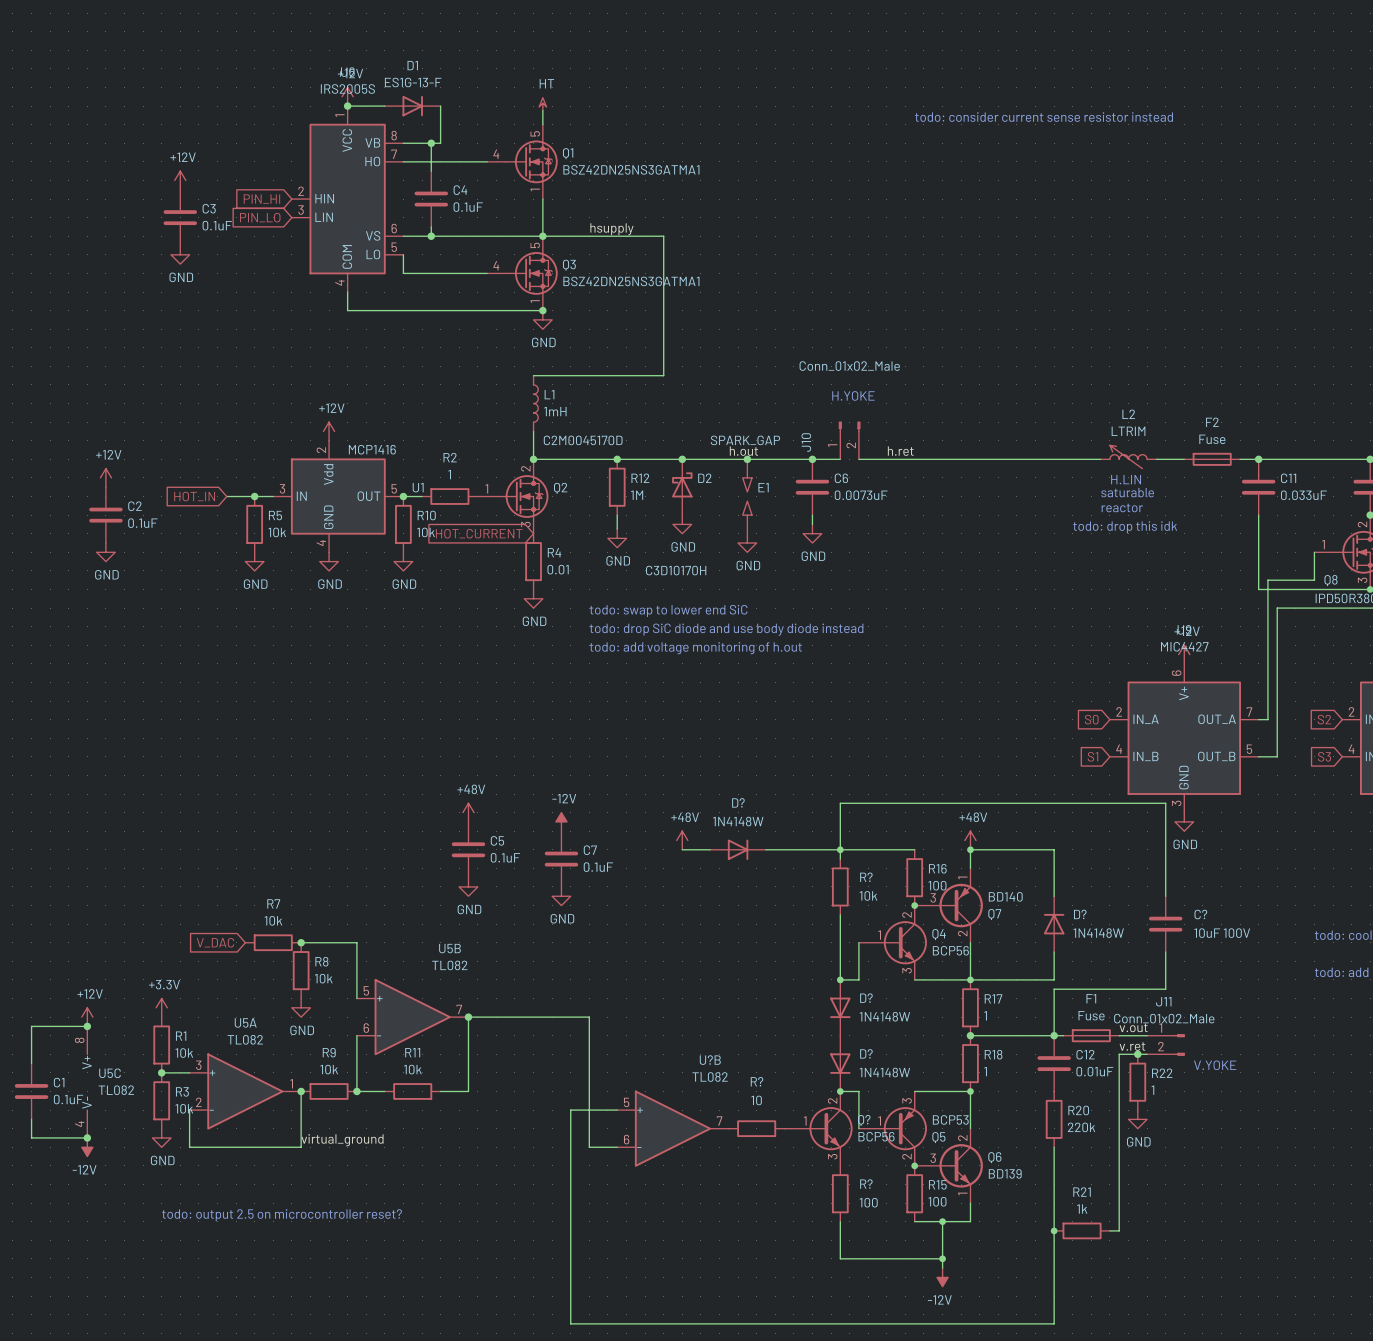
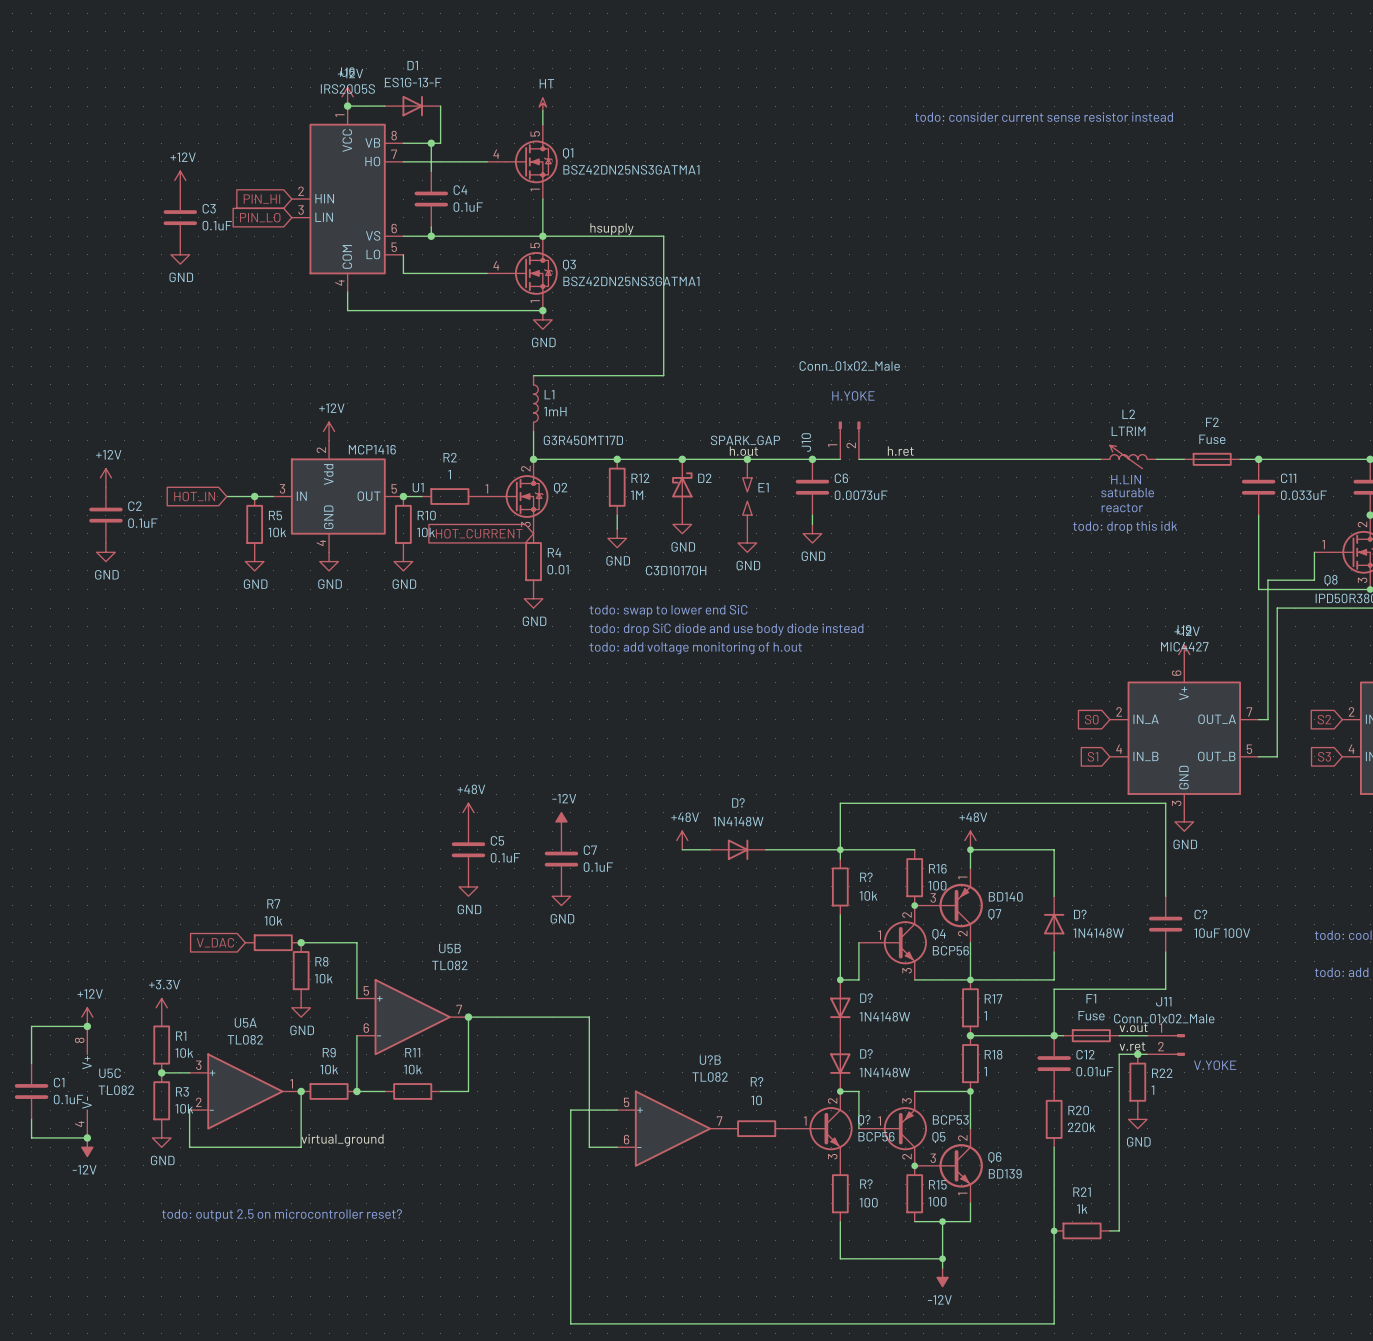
Q2 value: C2M0045170D (583, 440) -> G3R450MT17D (583, 440)

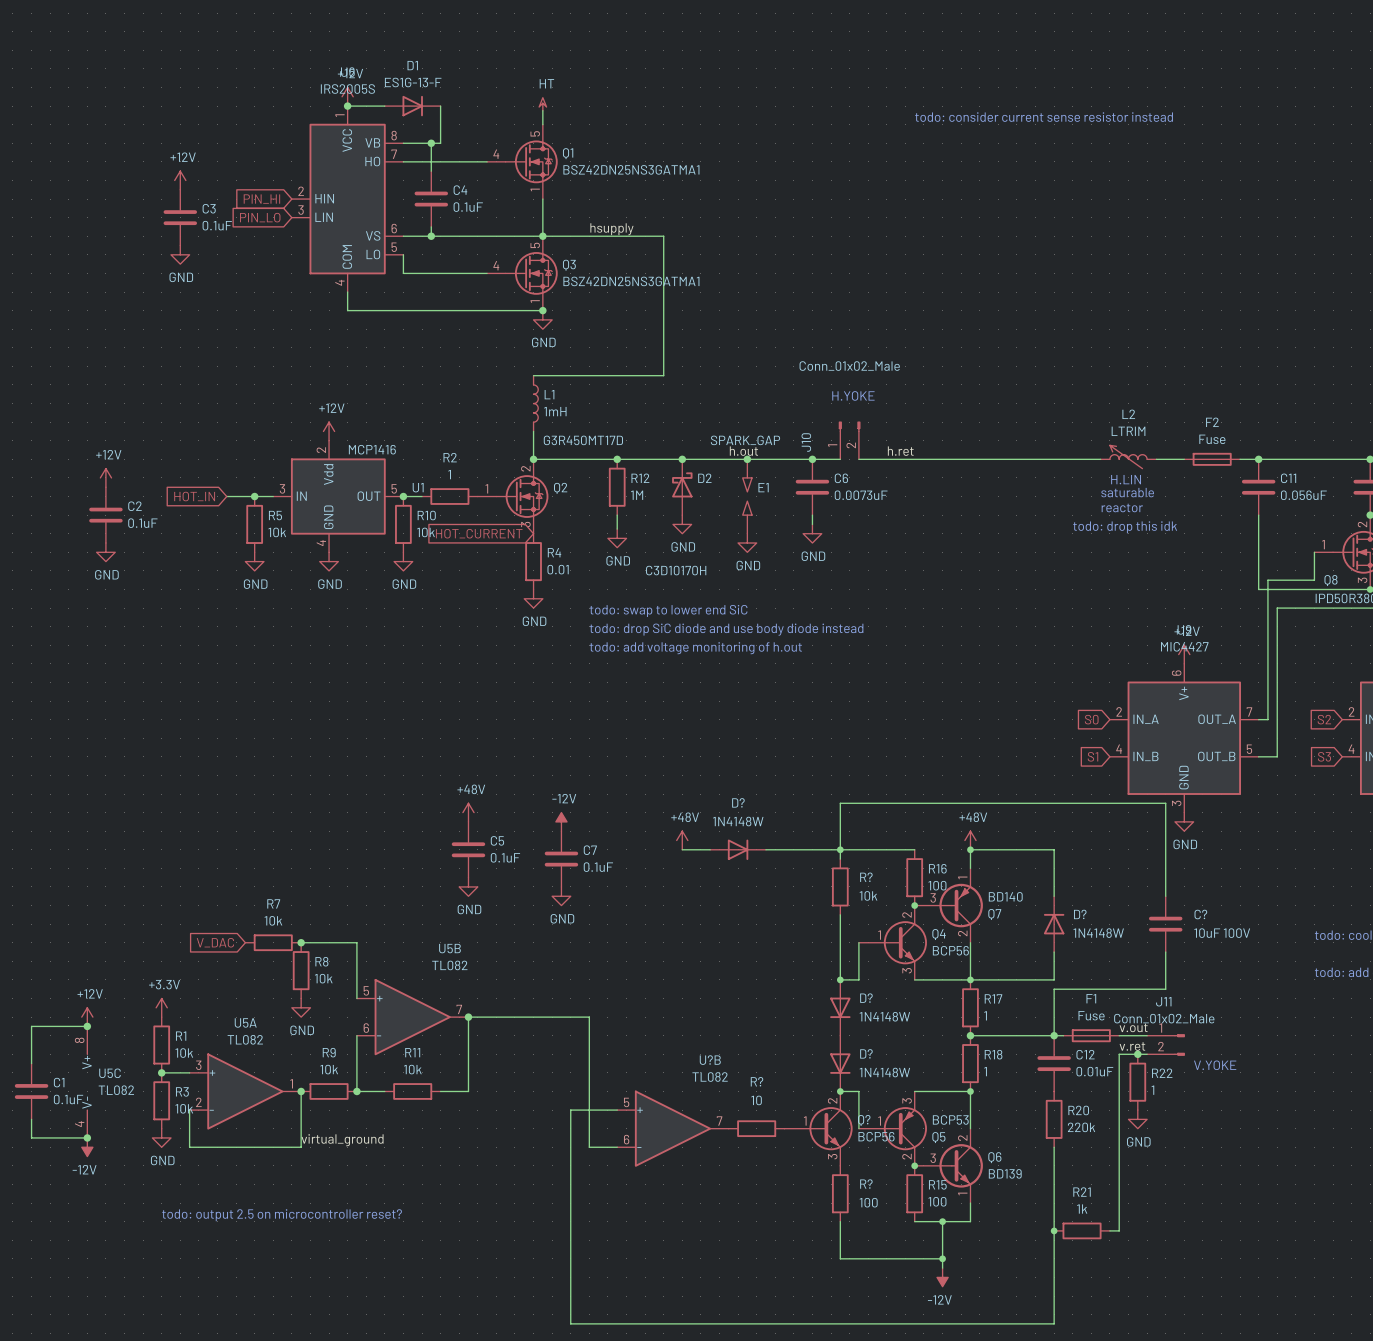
C11 value: 0.033uF (1303, 495) -> 0.056uF (1303, 495)

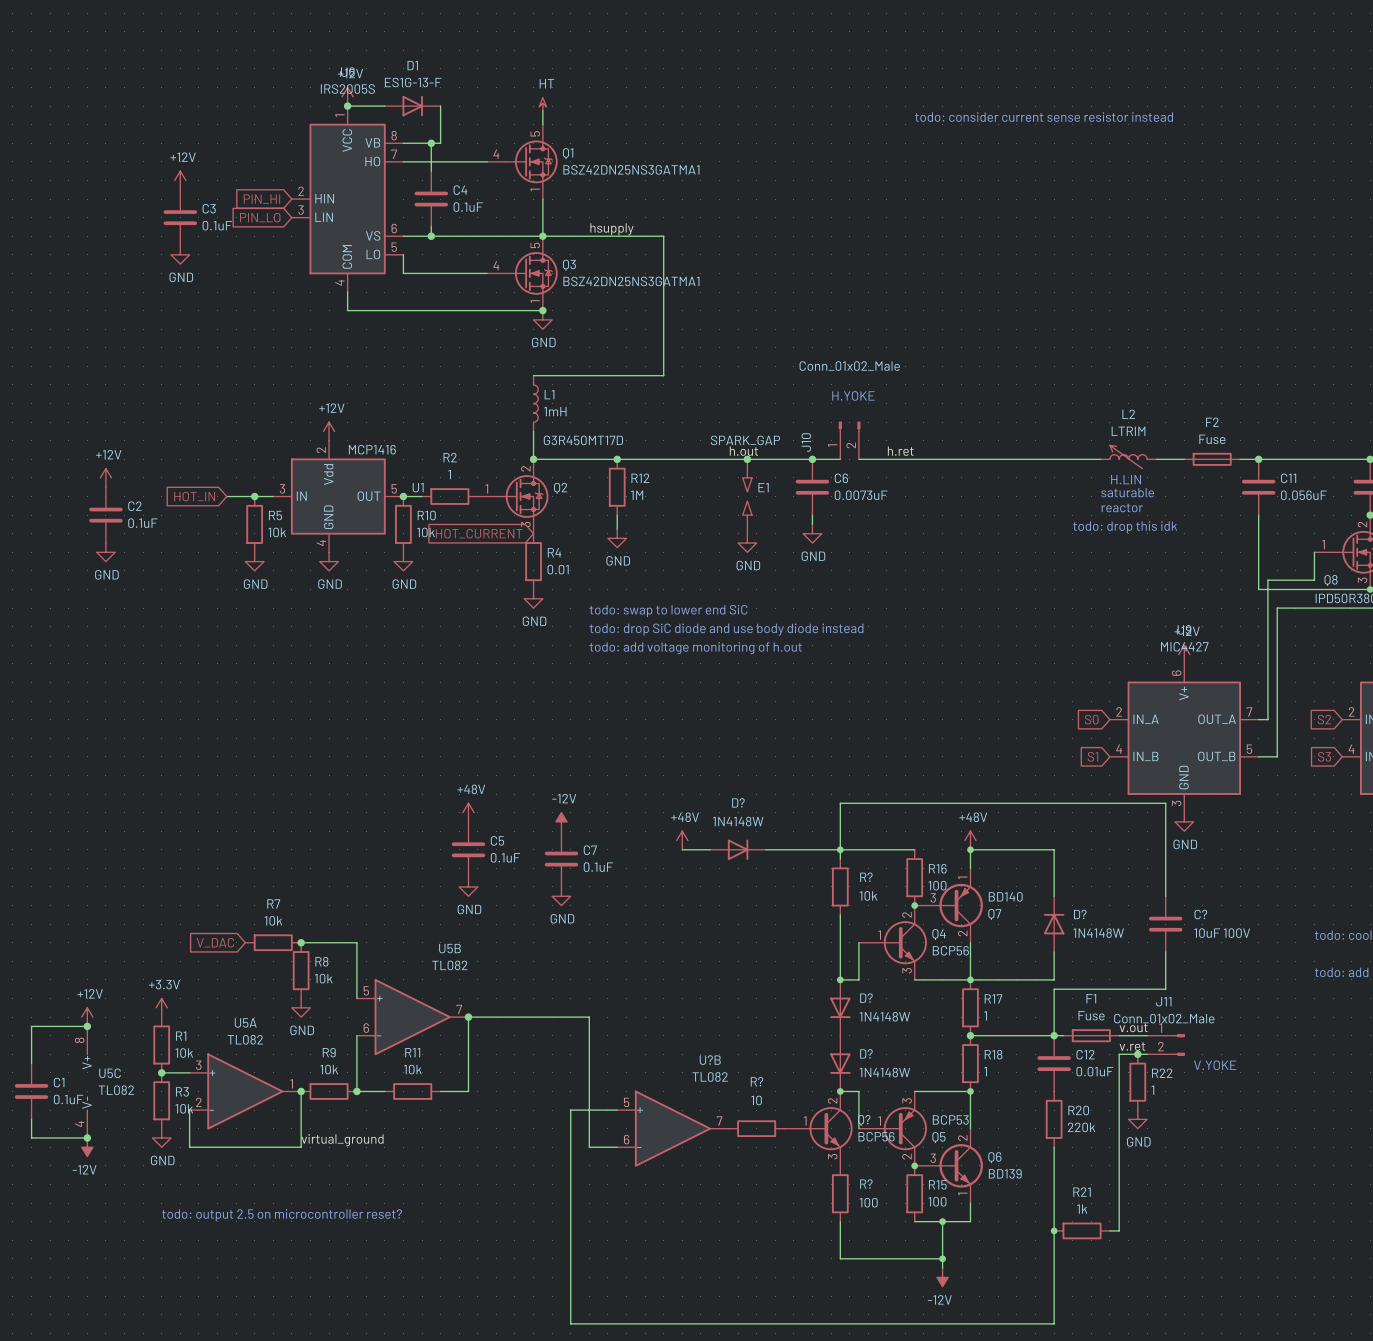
junction: (682, 459) -> none
D2: C3D10170H (682, 487) -> none
power symbol: GND (682, 524) -> none

